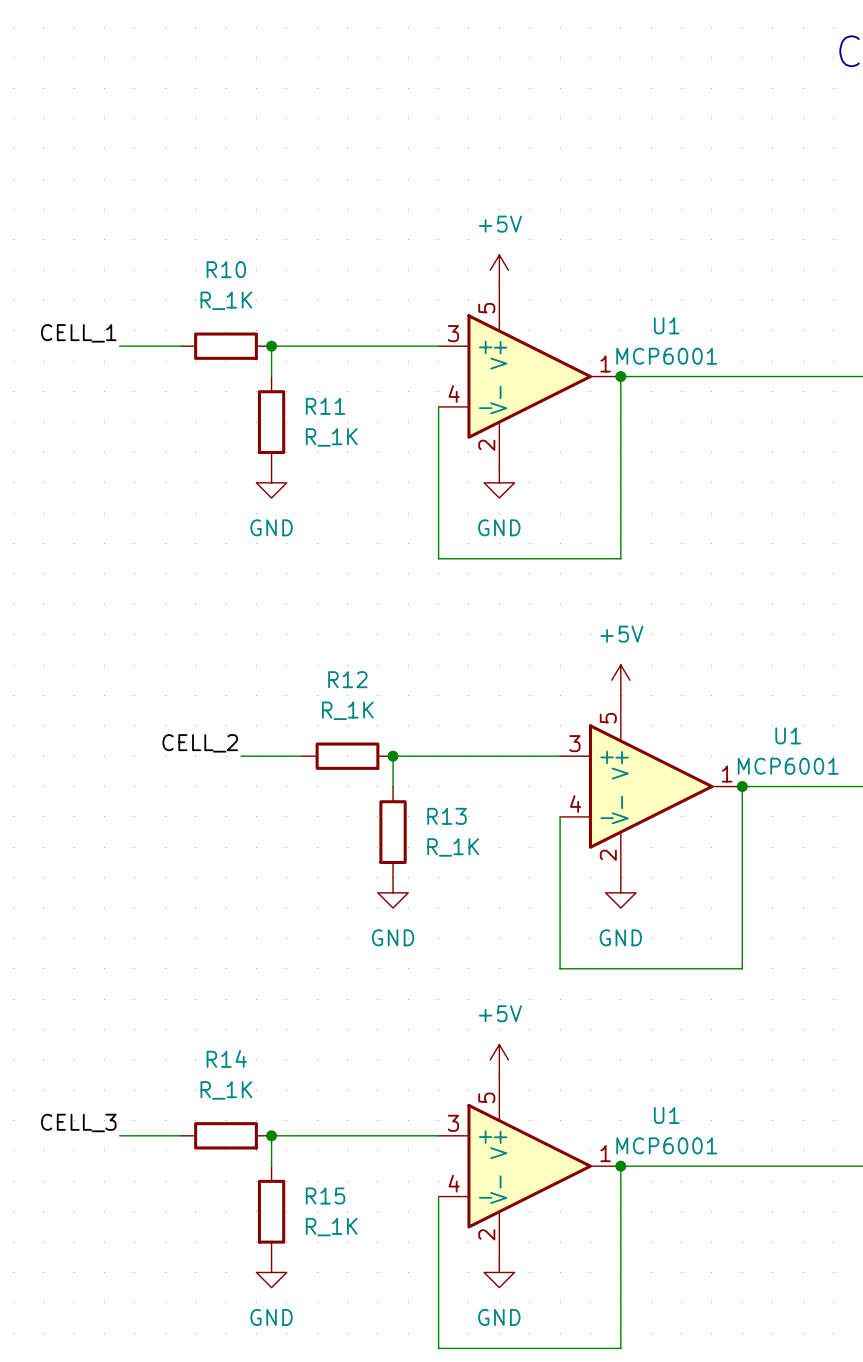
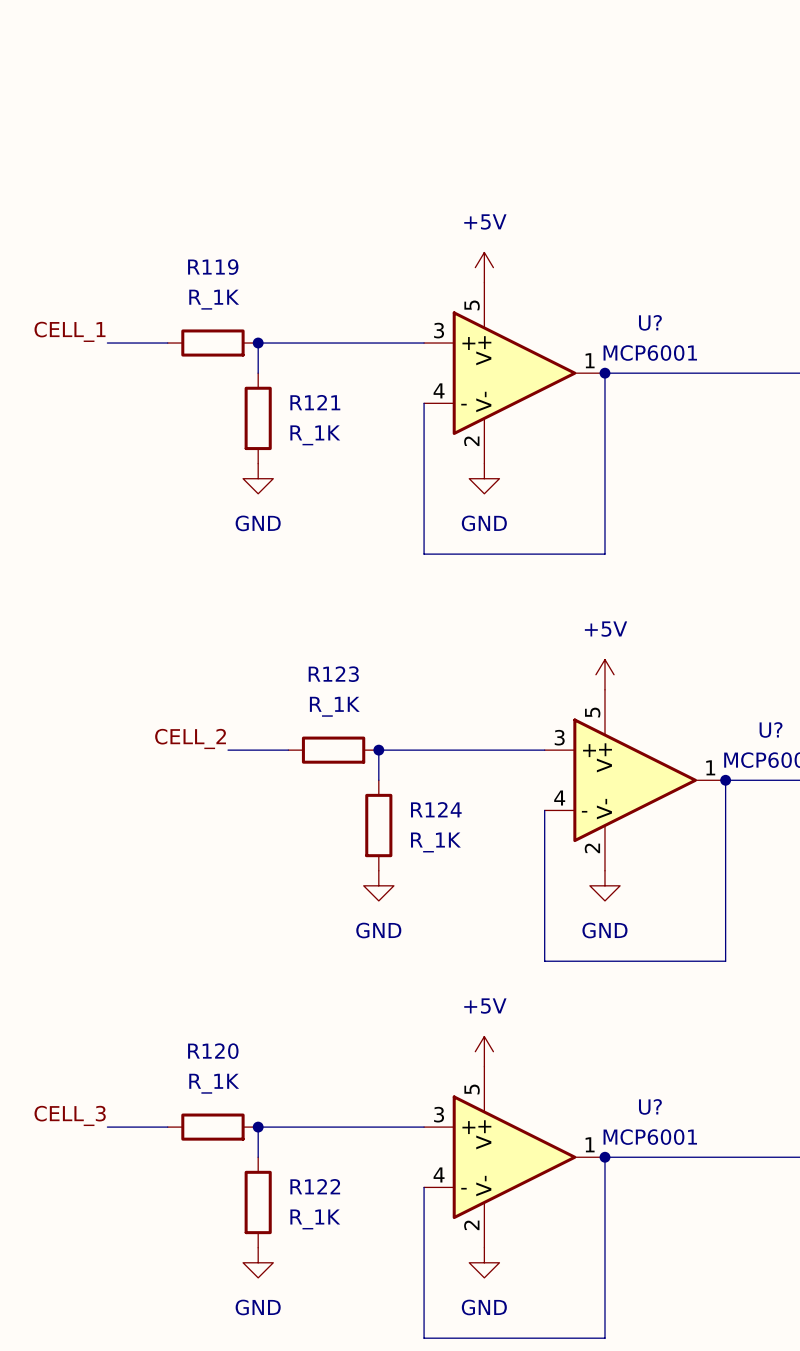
R10 name: R10 (226, 269) -> R119 (213, 267)
U1 name: U1 (666, 325) -> U? (650, 322)
R11 name: R11 (325, 406) -> R121 (315, 402)
R12 name: R12 (347, 679) -> R123 (333, 674)
U1 name: U1 (788, 735) -> U? (771, 729)
R13 name: R13 (447, 816) -> R124 (436, 809)
R14 name: R14 (226, 1058) -> R120 (213, 1051)
U1 name: U1 (666, 1115) -> U? (650, 1106)
R15 name: R15 (325, 1195) -> R122 (315, 1186)

